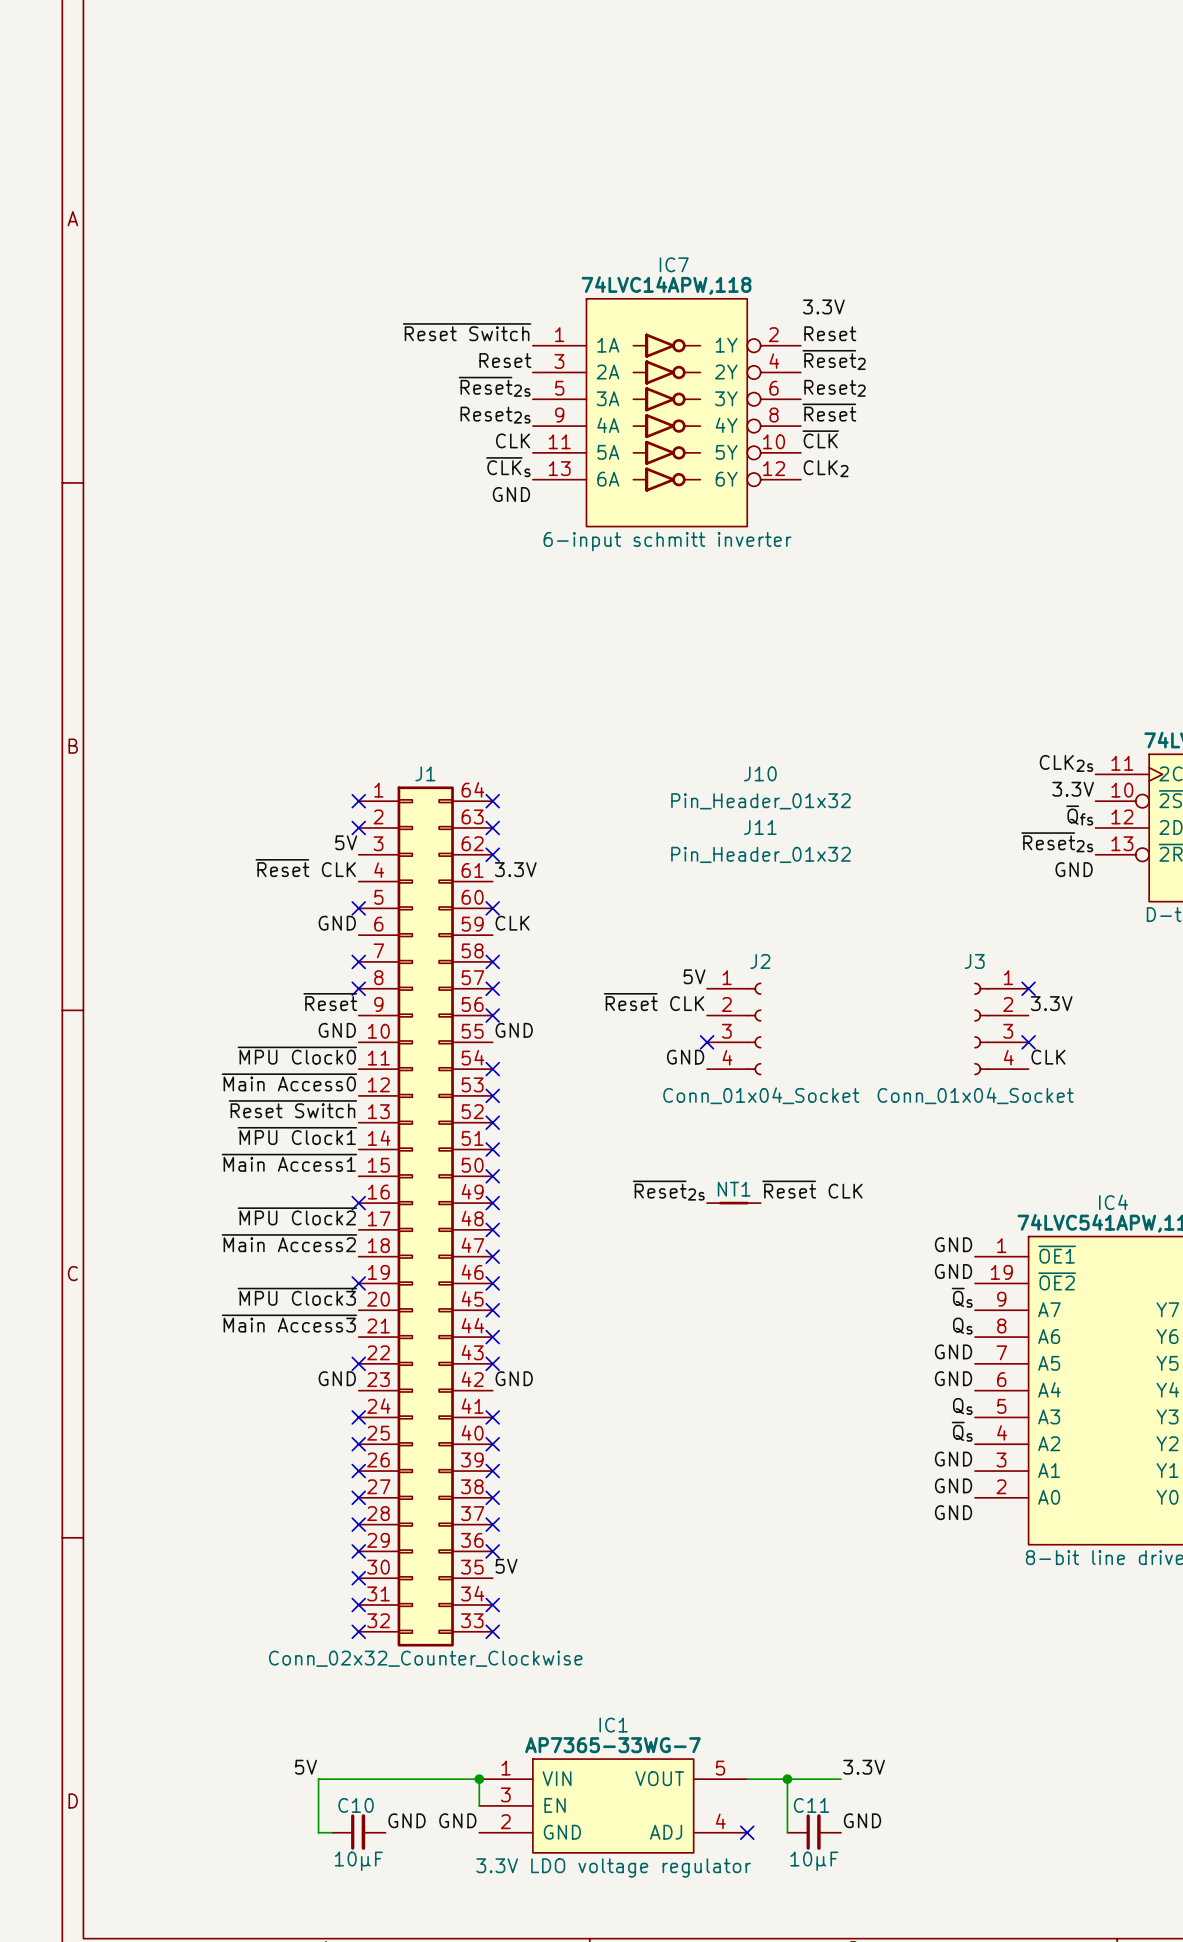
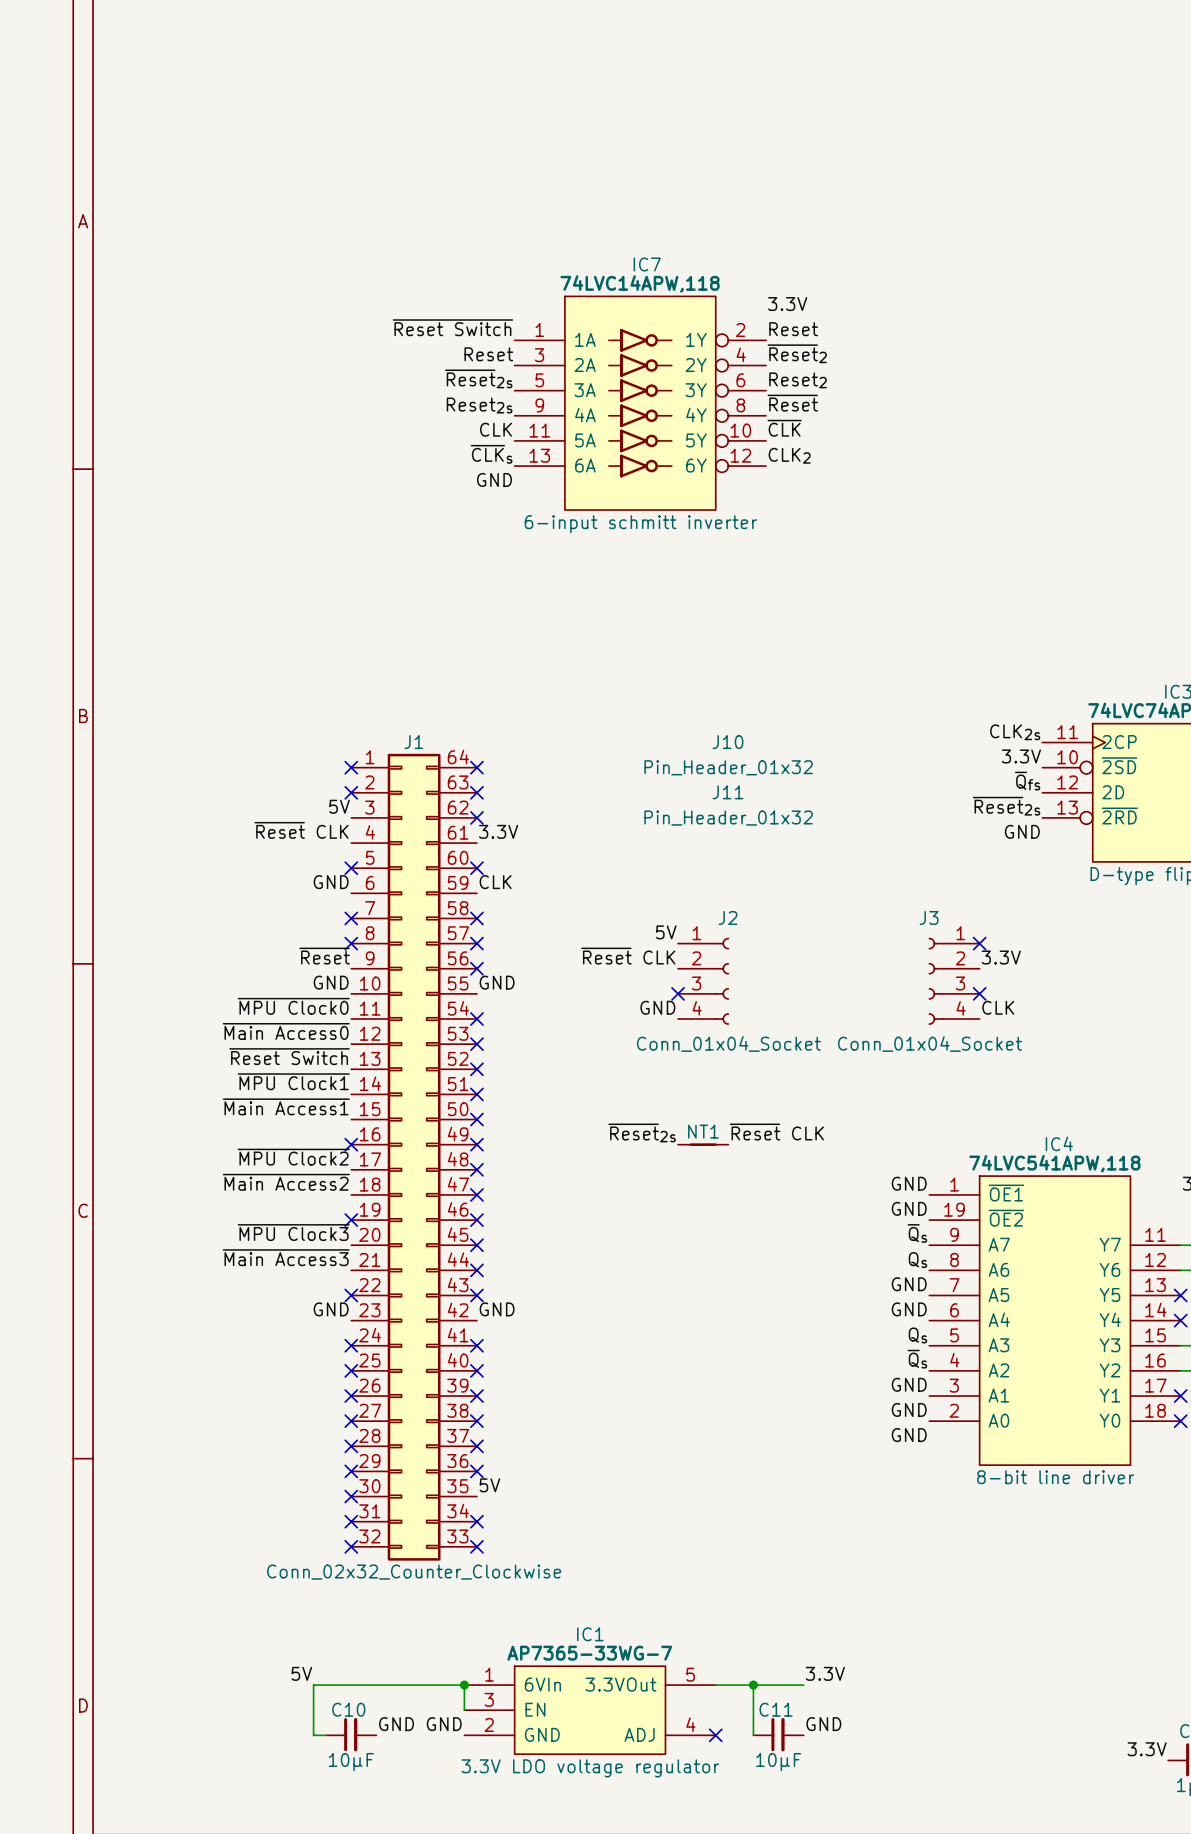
IC1 pin name: VIN (556, 1778) -> 6VIn (542, 1684)
IC1 pin name: VOUT (659, 1778) -> 3.3VOut (621, 1684)

